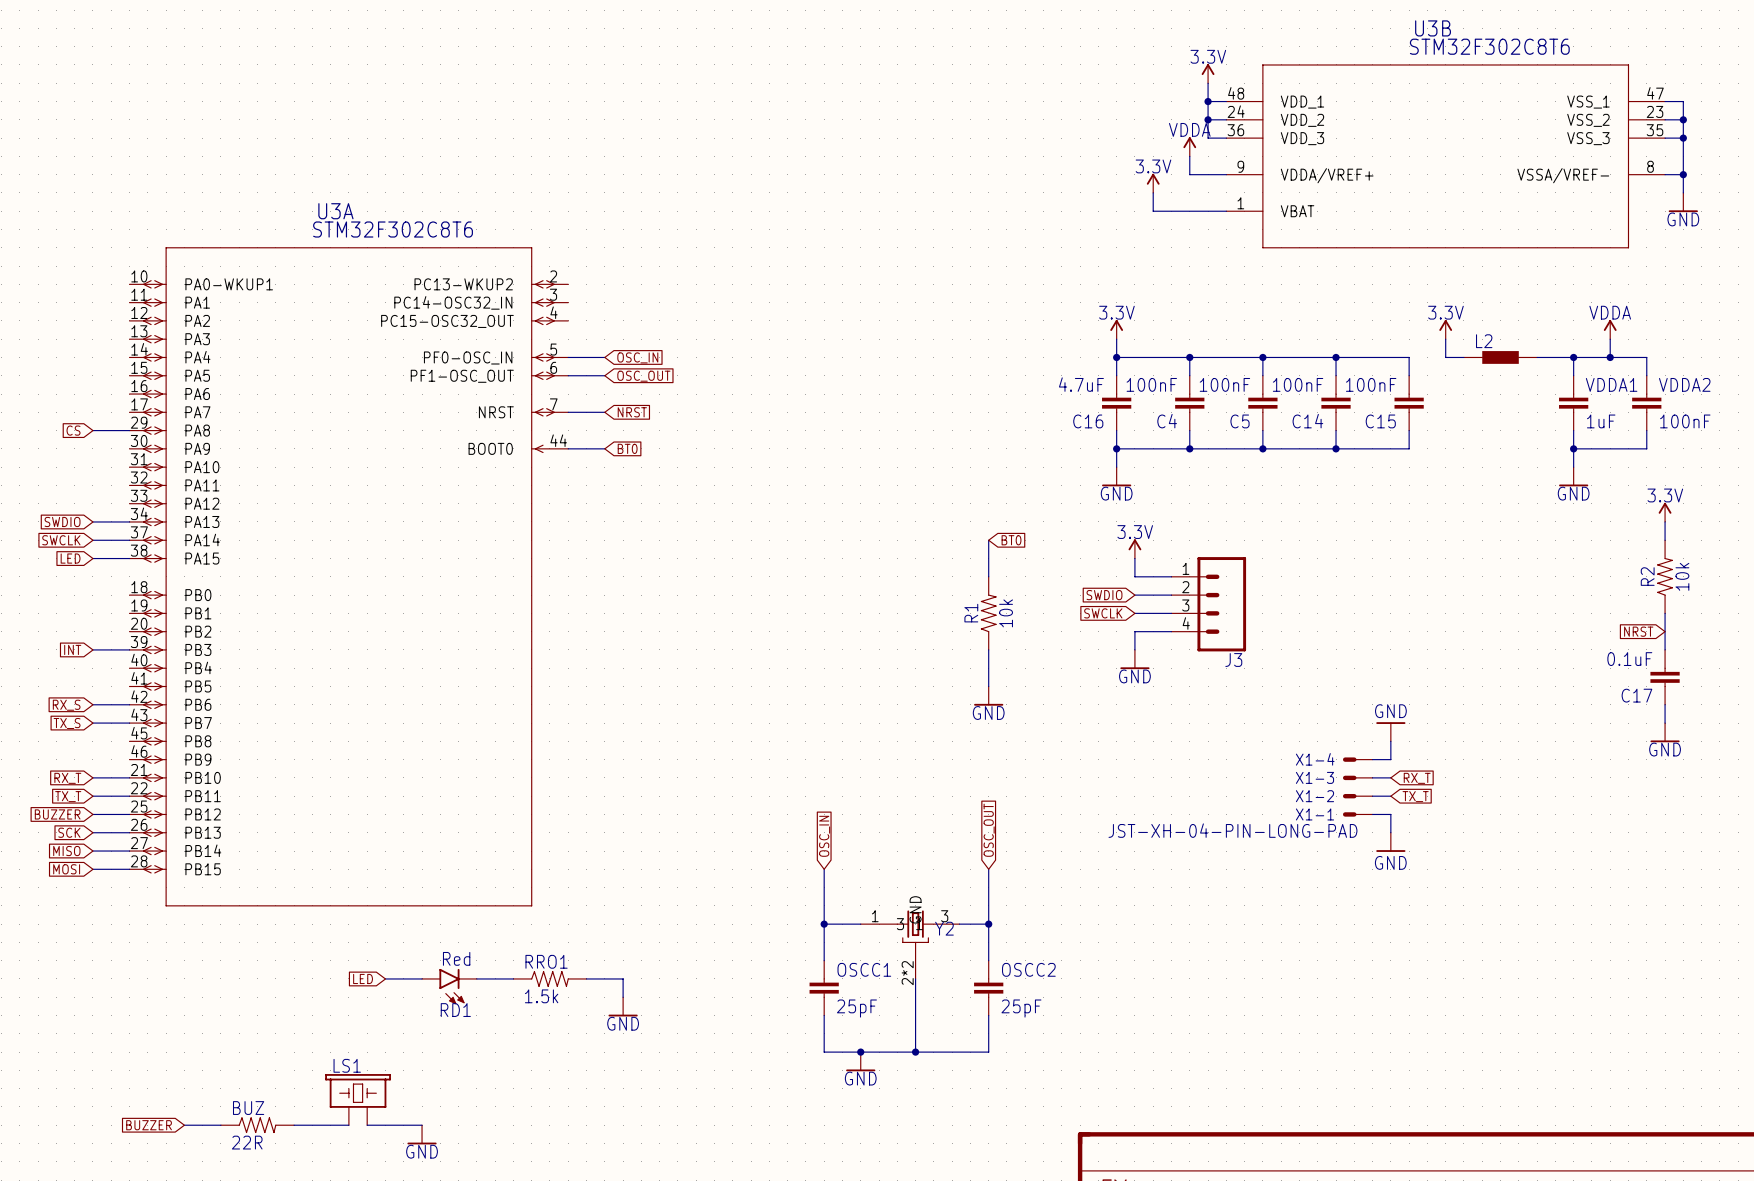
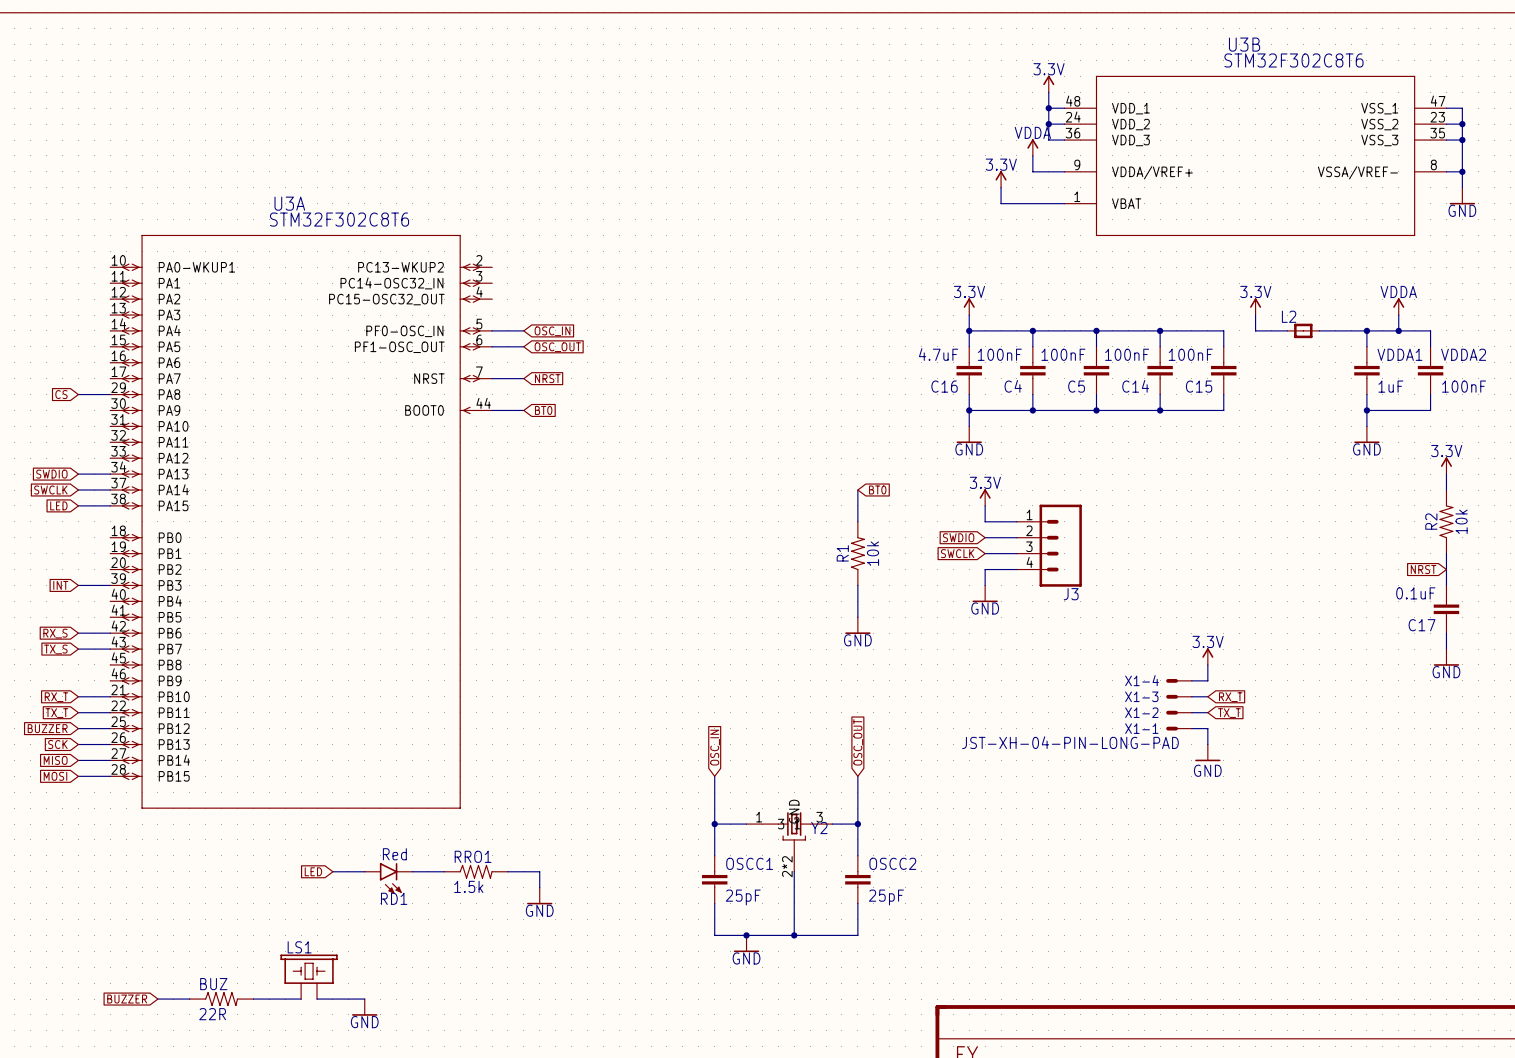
L2 symbol: [1463, 351, 1538, 364] -> [1287, 323, 1320, 339]
power symbol: GND (1390, 731) -> 3.3V (1207, 656)

